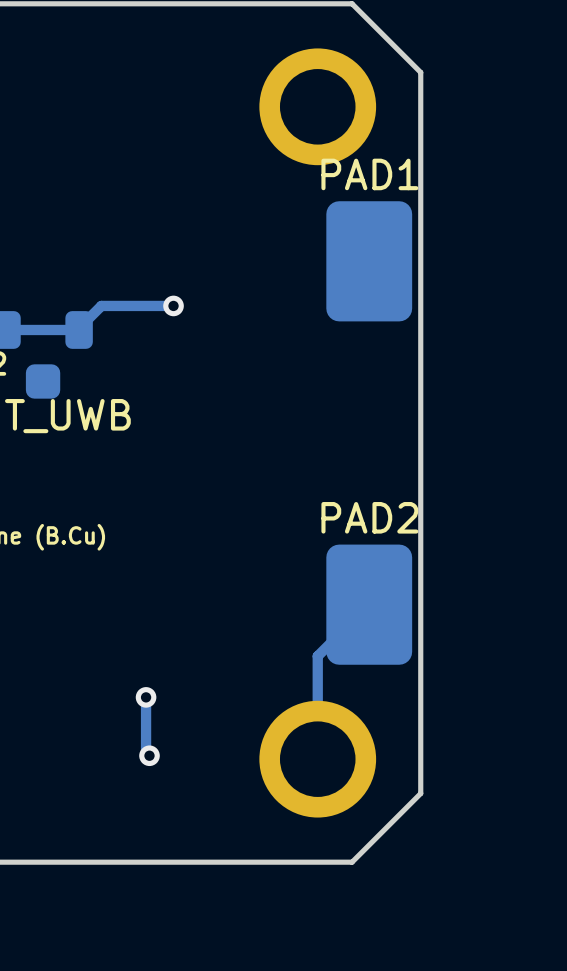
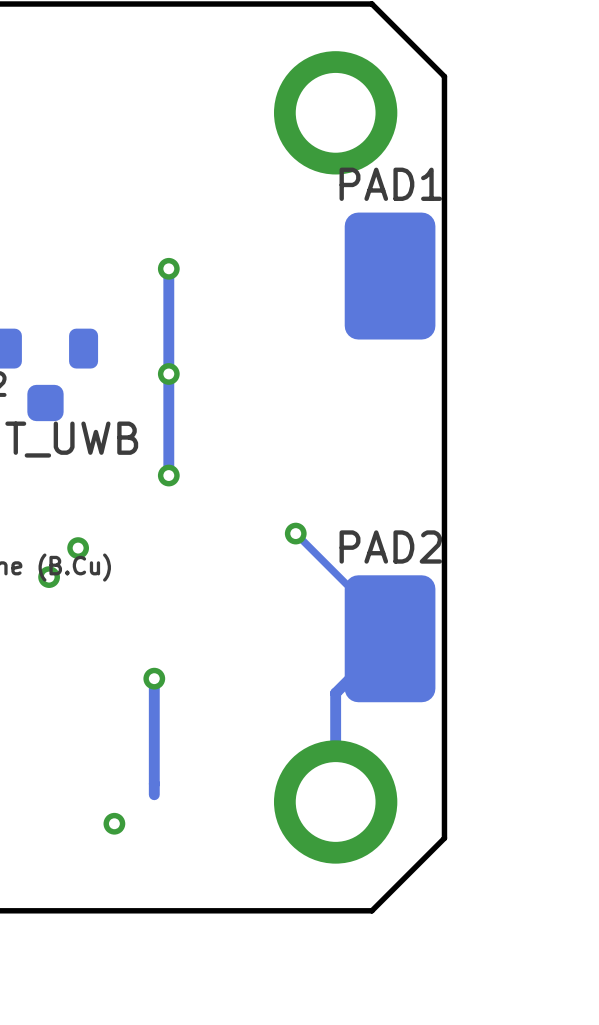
track: none -> (168, 268) (168, 475)
via: none -> (168, 268)
track: (173, 305) (101, 305) (77, 329) -> none
via: (173, 305) -> none
track: (79, 329) (7, 329) -> none
via: none -> (168, 373)
via: none -> (168, 475)
track: none -> (295, 533) (353, 591)
via: none -> (295, 533)
via: none -> (78, 548)
via: none -> (49, 577)
track: none -> (154, 678) (154, 736)
via: none -> (154, 678)
via: (146, 697) -> none
via: (149, 755) -> none
via: none -> (114, 823)

